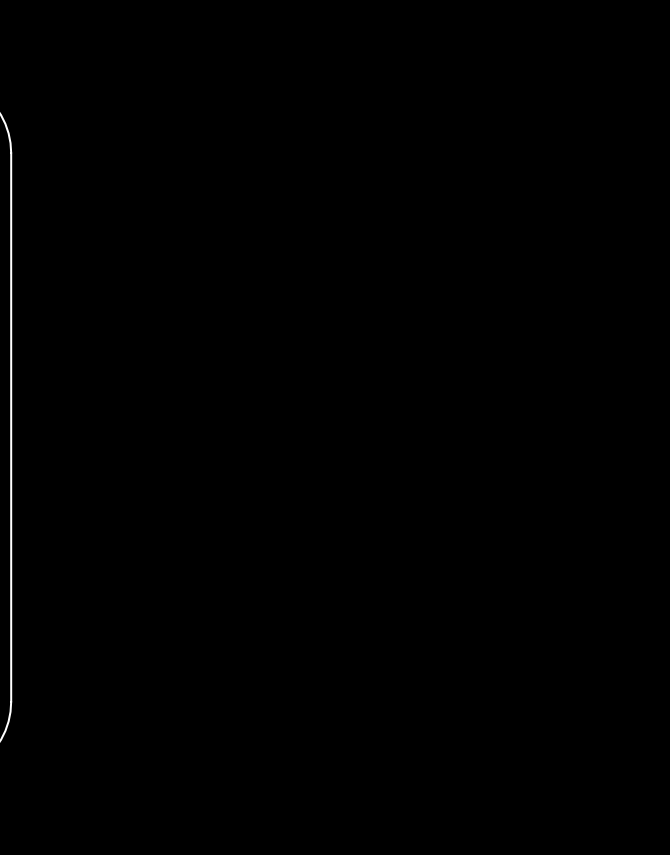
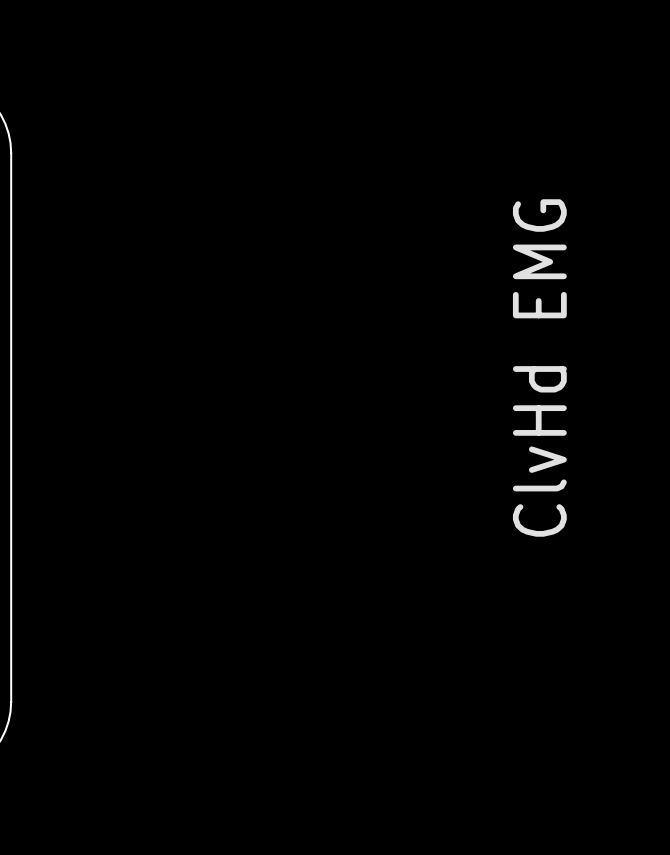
text: none -> ClvHd EMG (539, 367)

